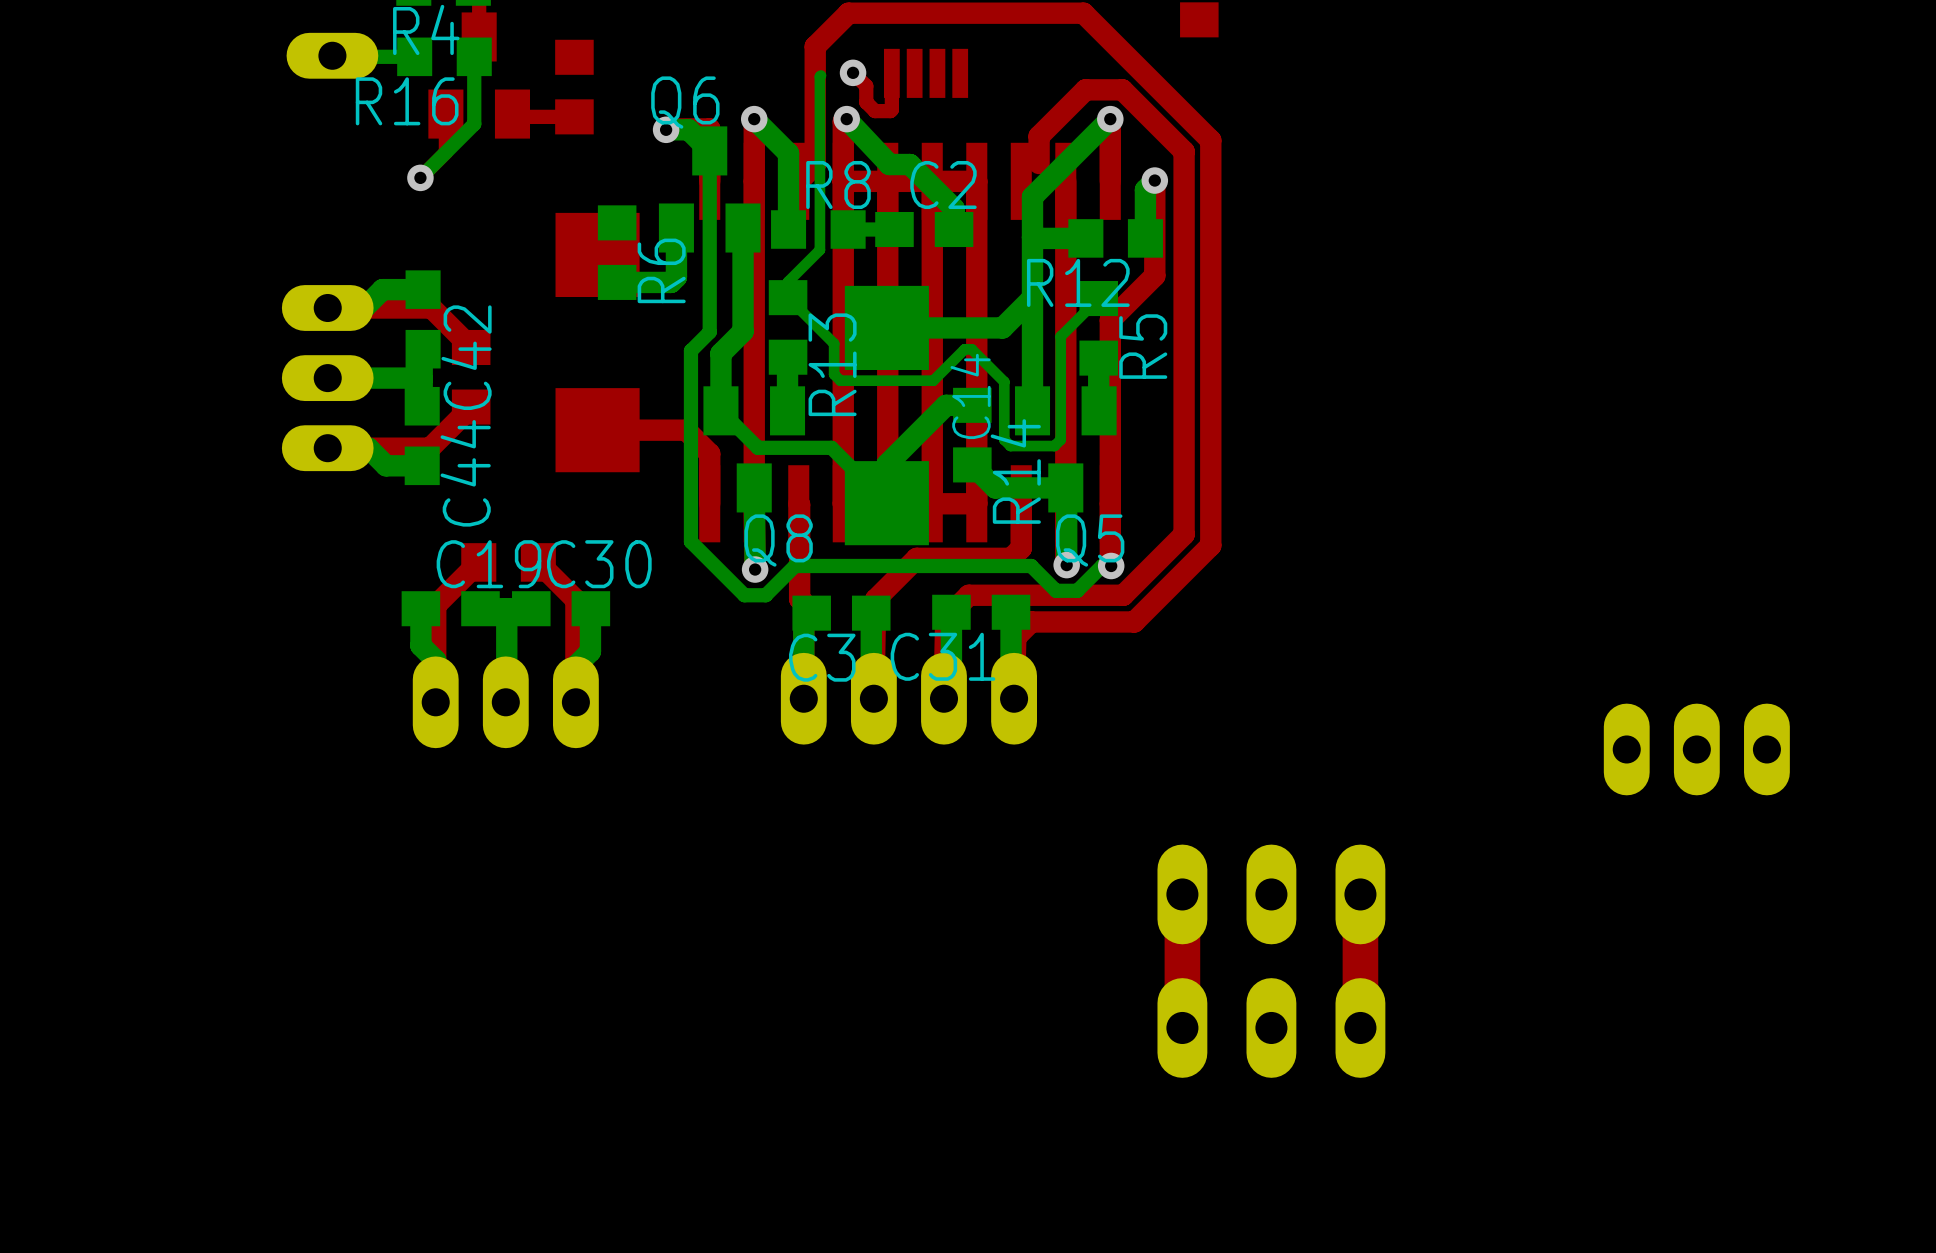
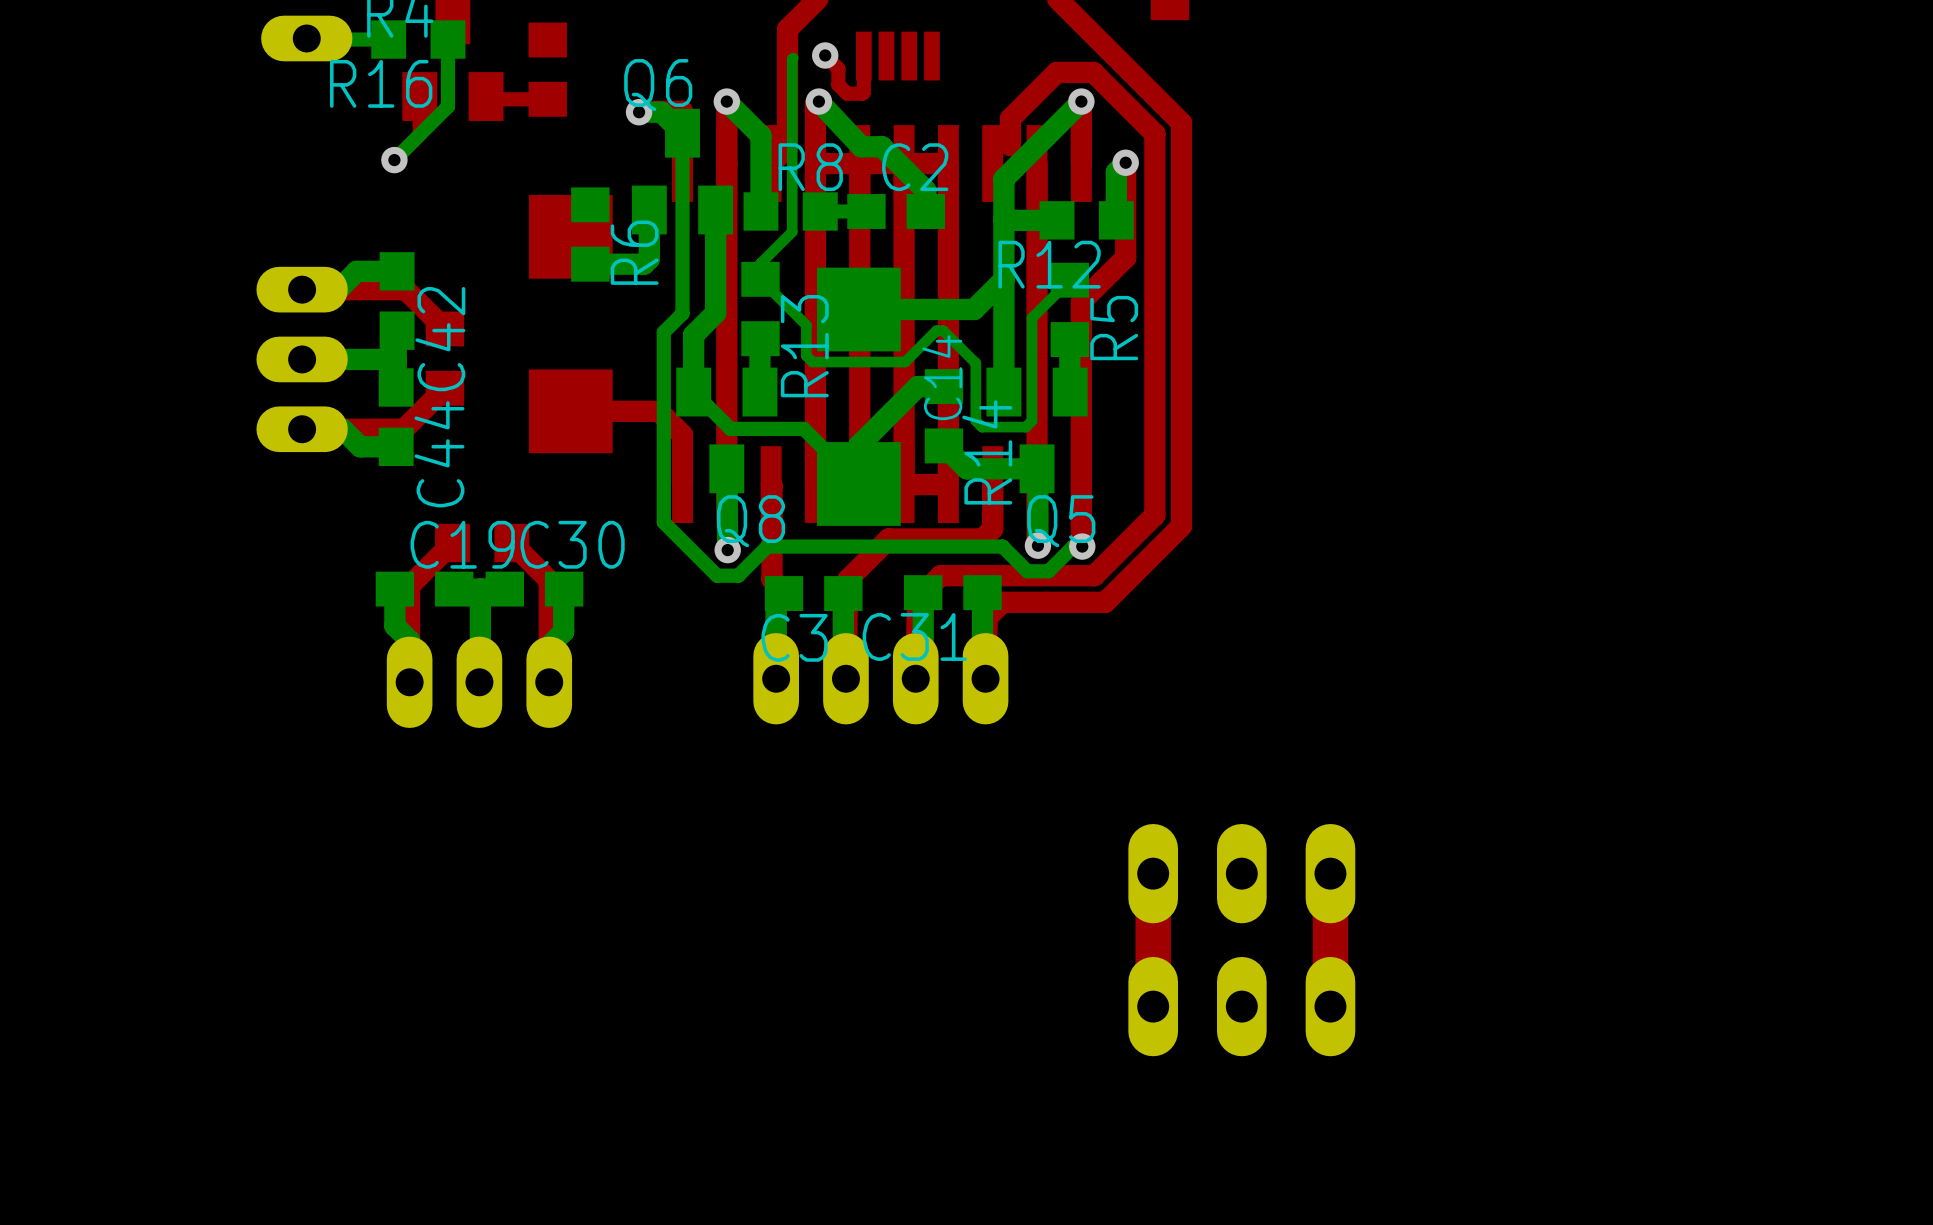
part: (1696, 749) -> none

